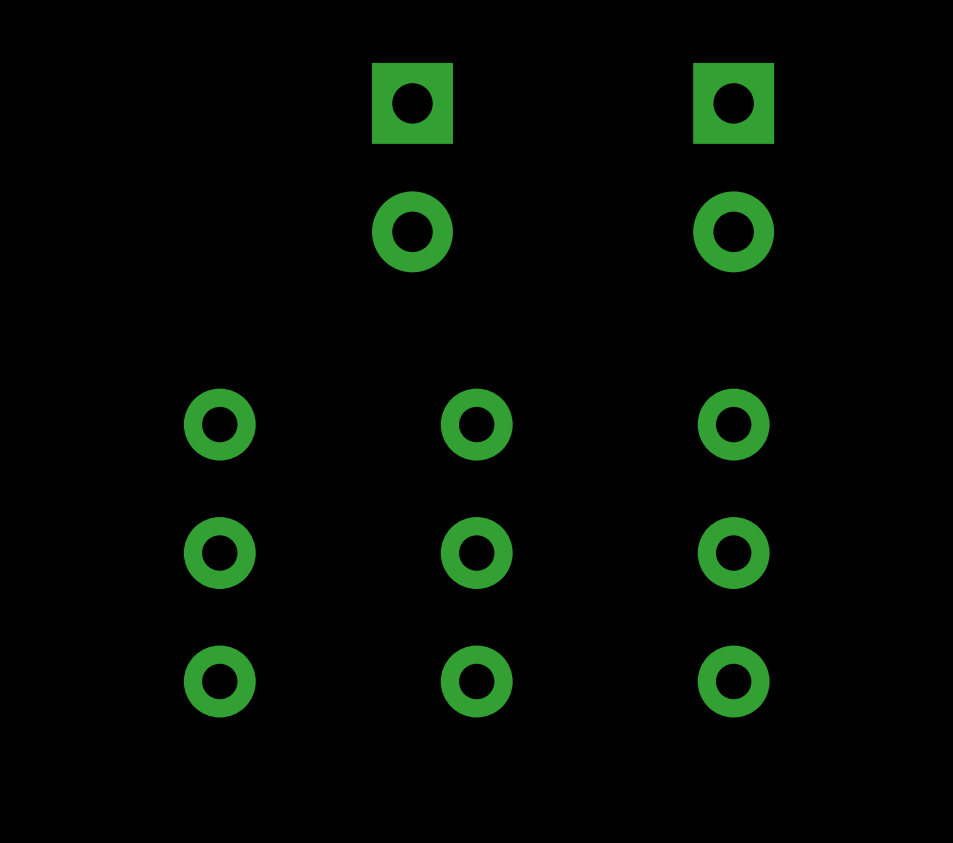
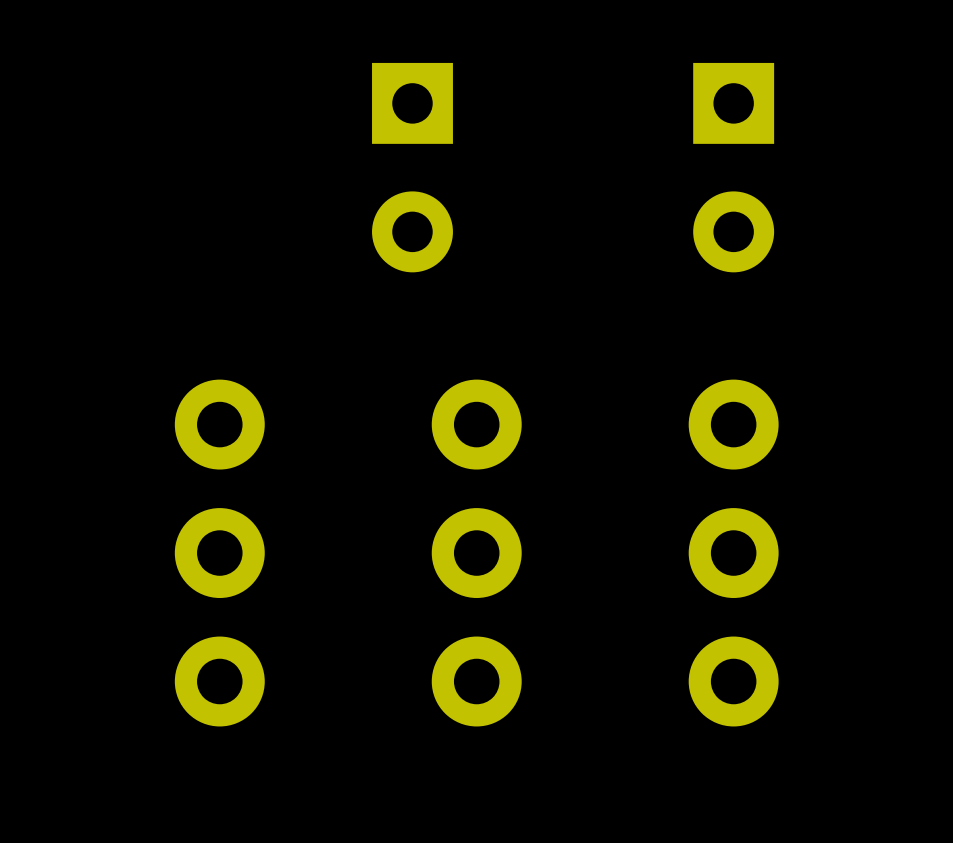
part footprint: [183, 388, 256, 718] -> [174, 379, 265, 727]
part footprint: [440, 388, 513, 718] -> [431, 379, 522, 727]
part footprint: [697, 388, 770, 718] -> [688, 379, 779, 727]

